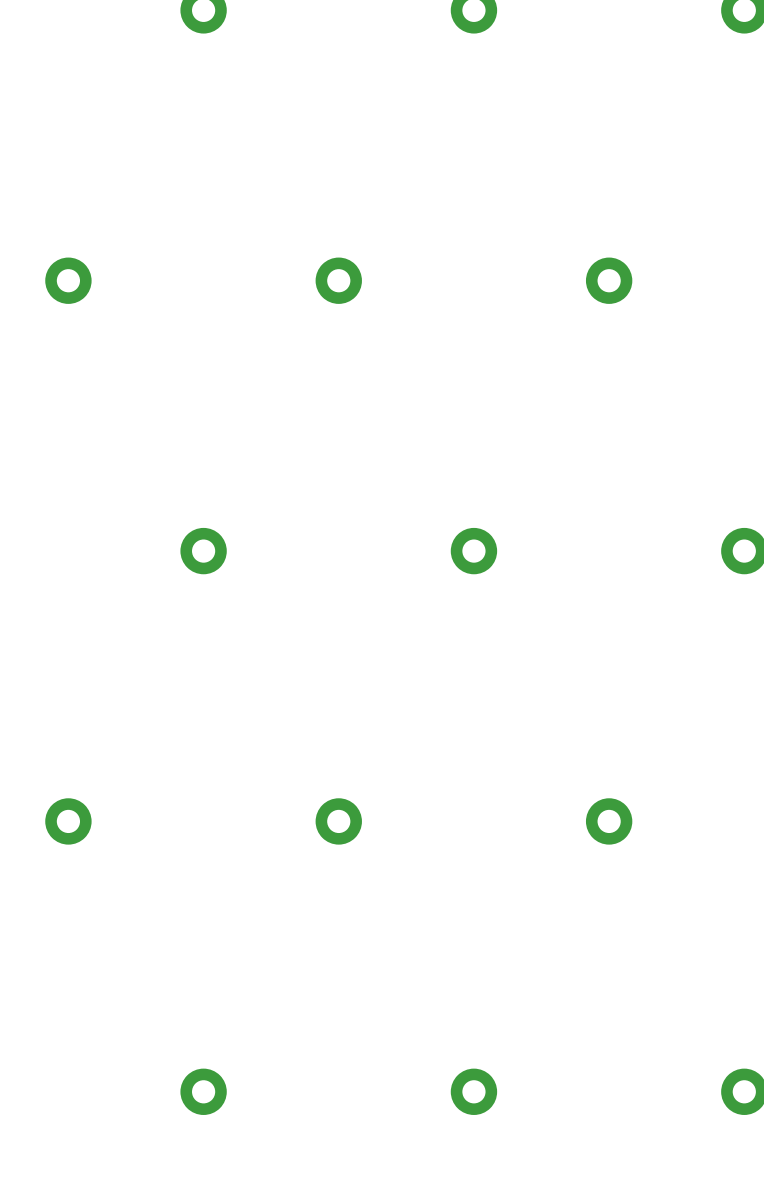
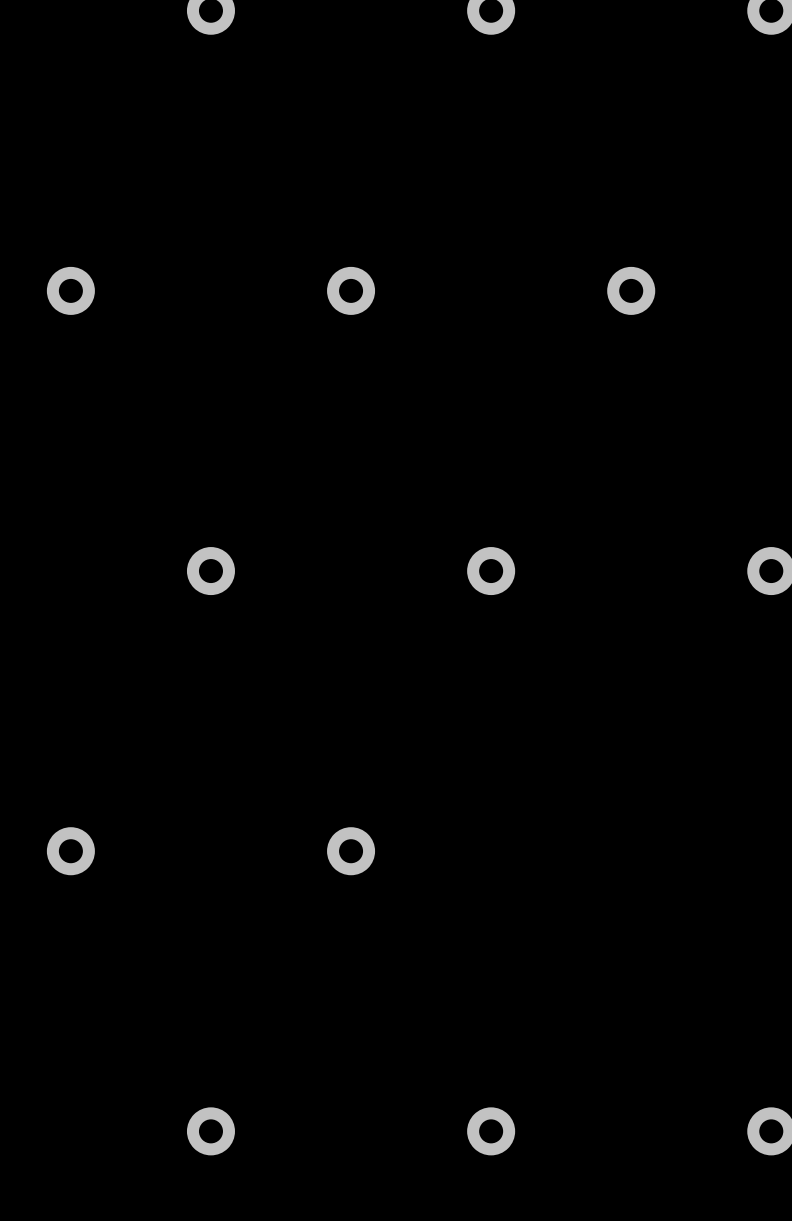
via: (609, 821) -> none

